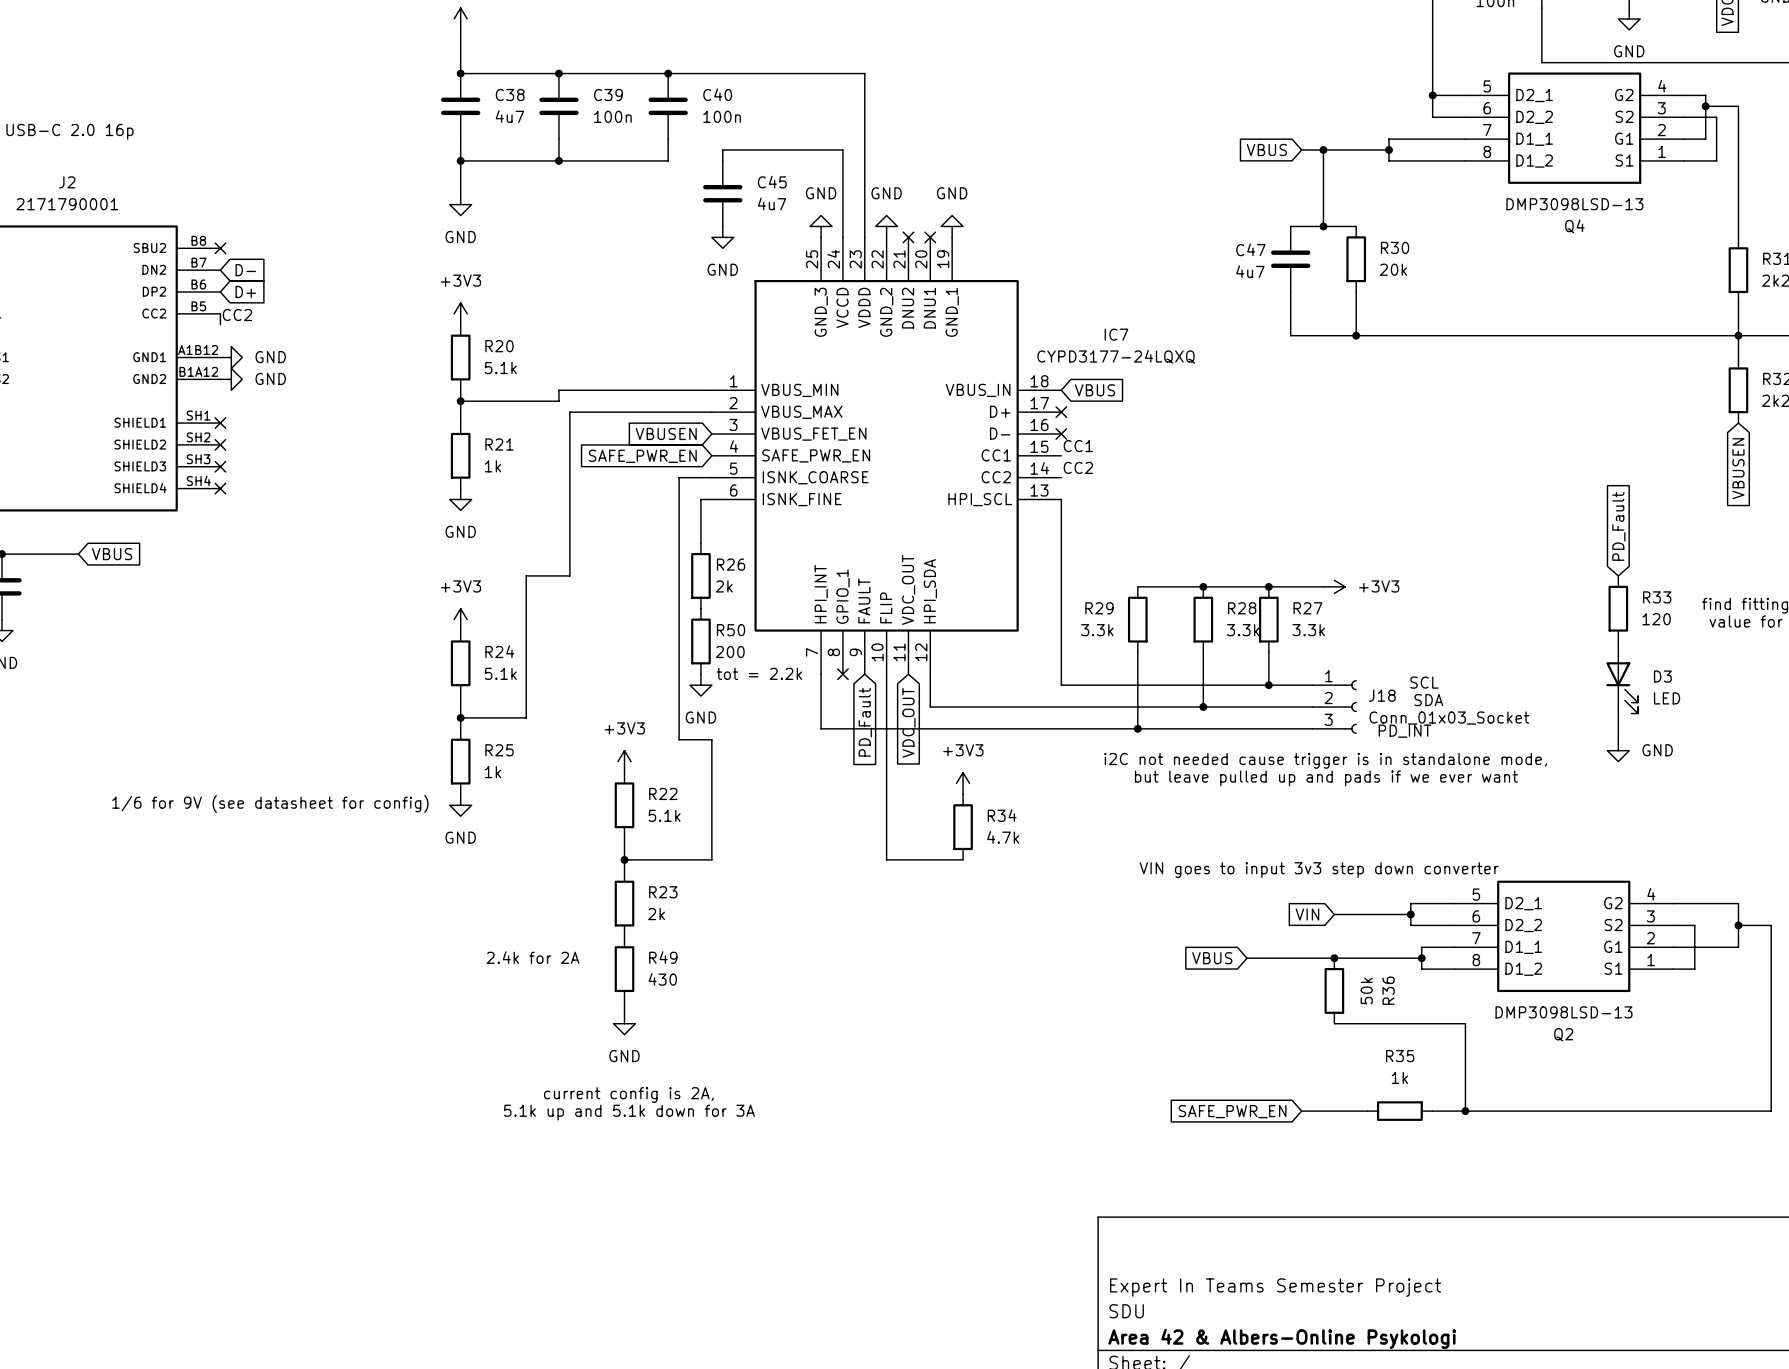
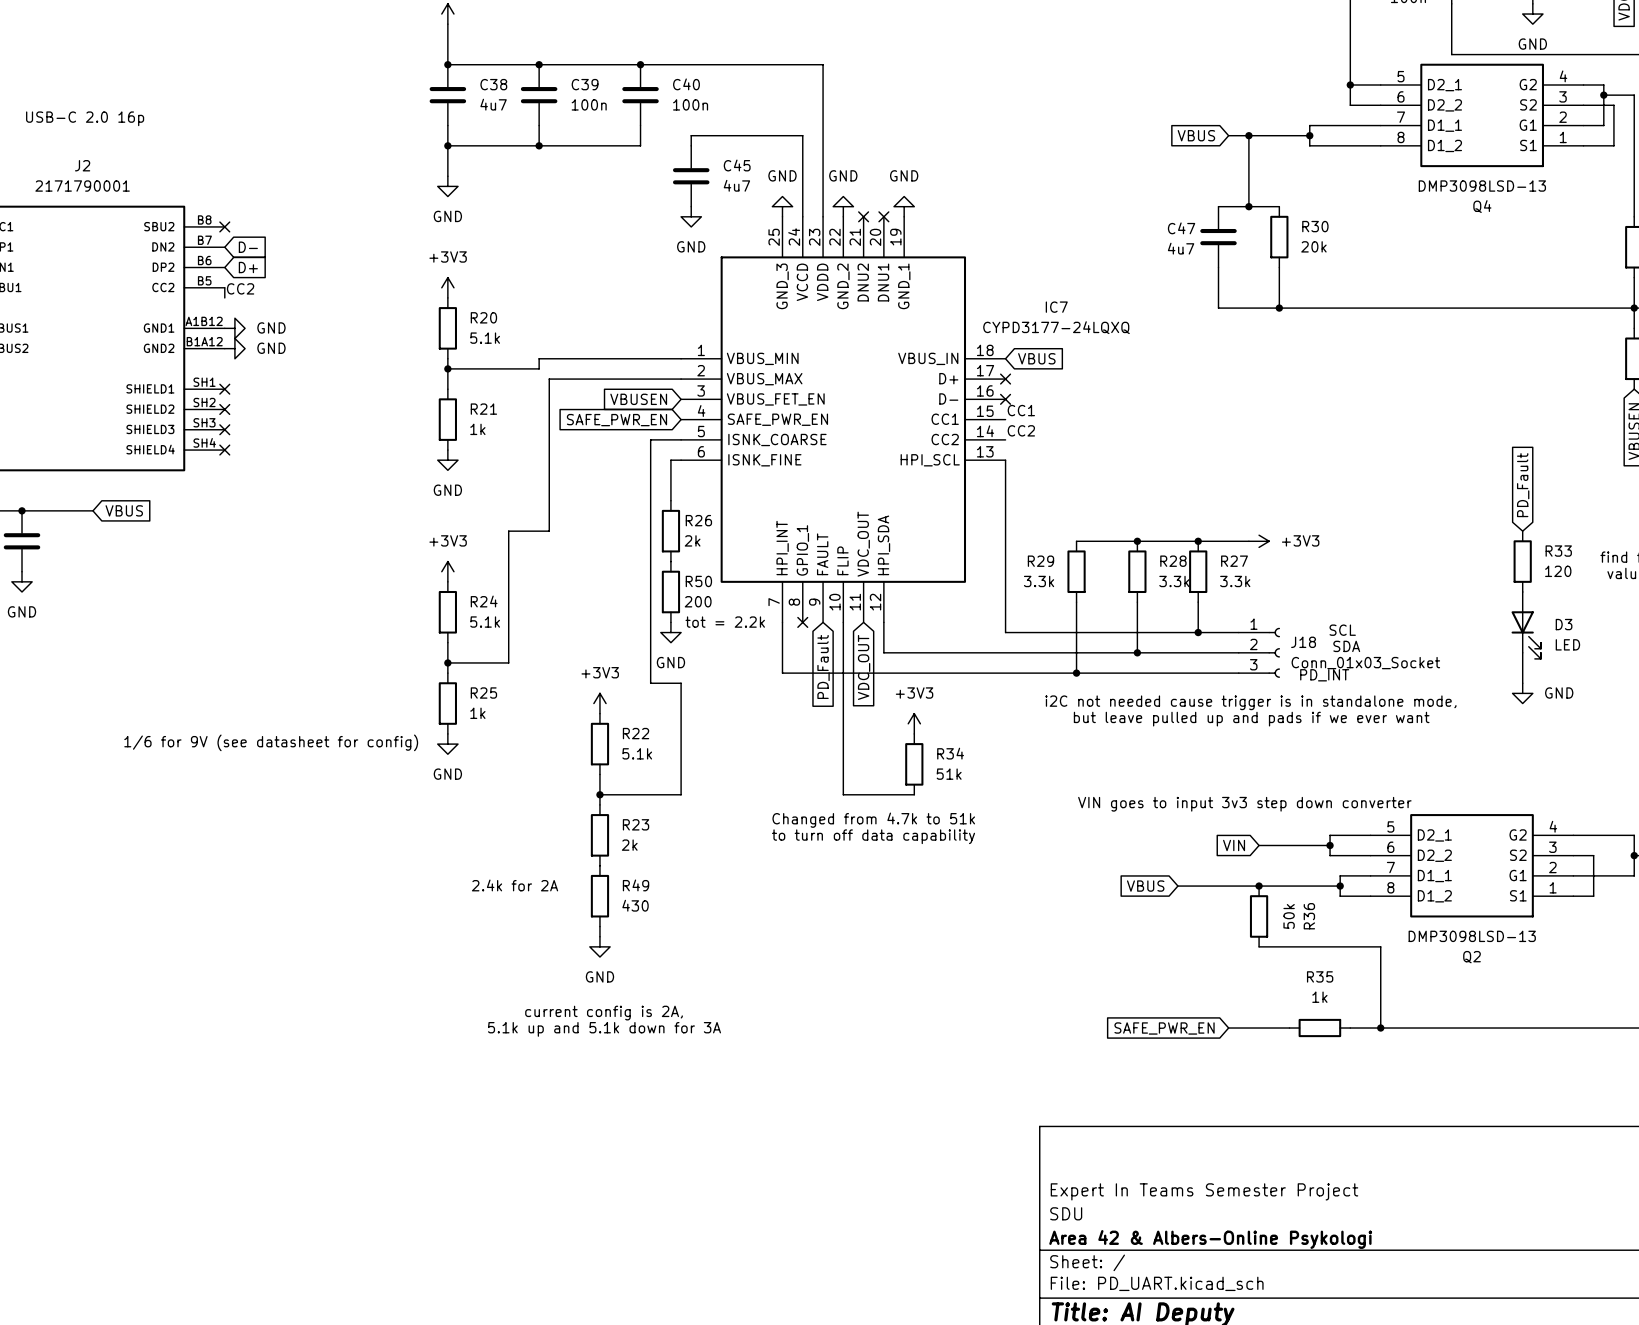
R34 value: 4.7k (1003, 837) -> 51k (949, 774)
text: none -> Changed from 4.7k to 51k (873, 820)
text: none -> to turn off data capability (873, 836)

